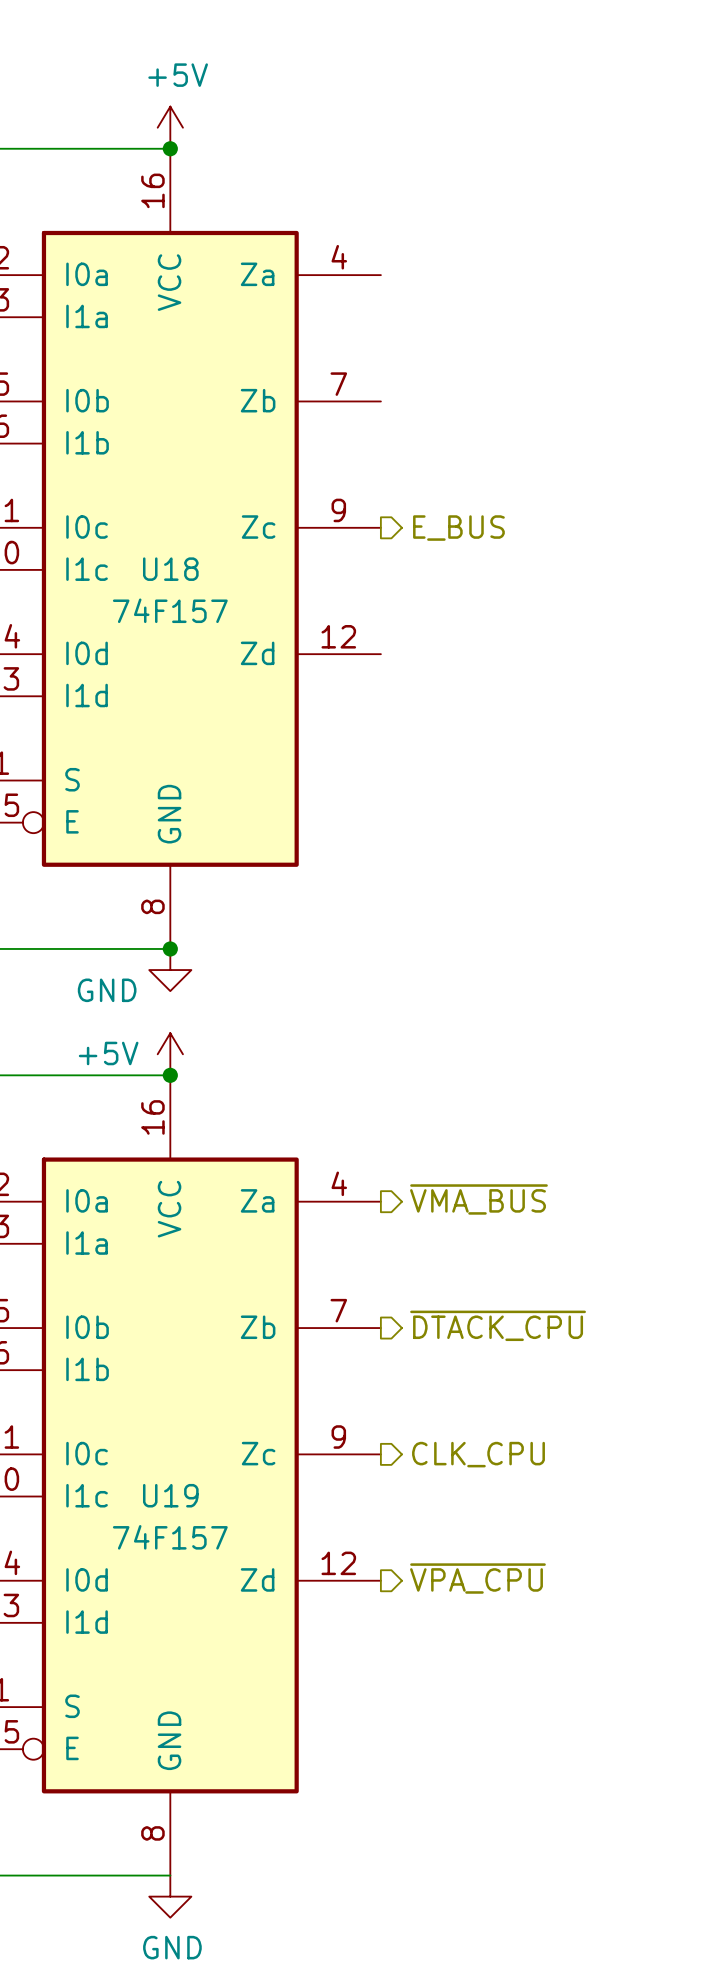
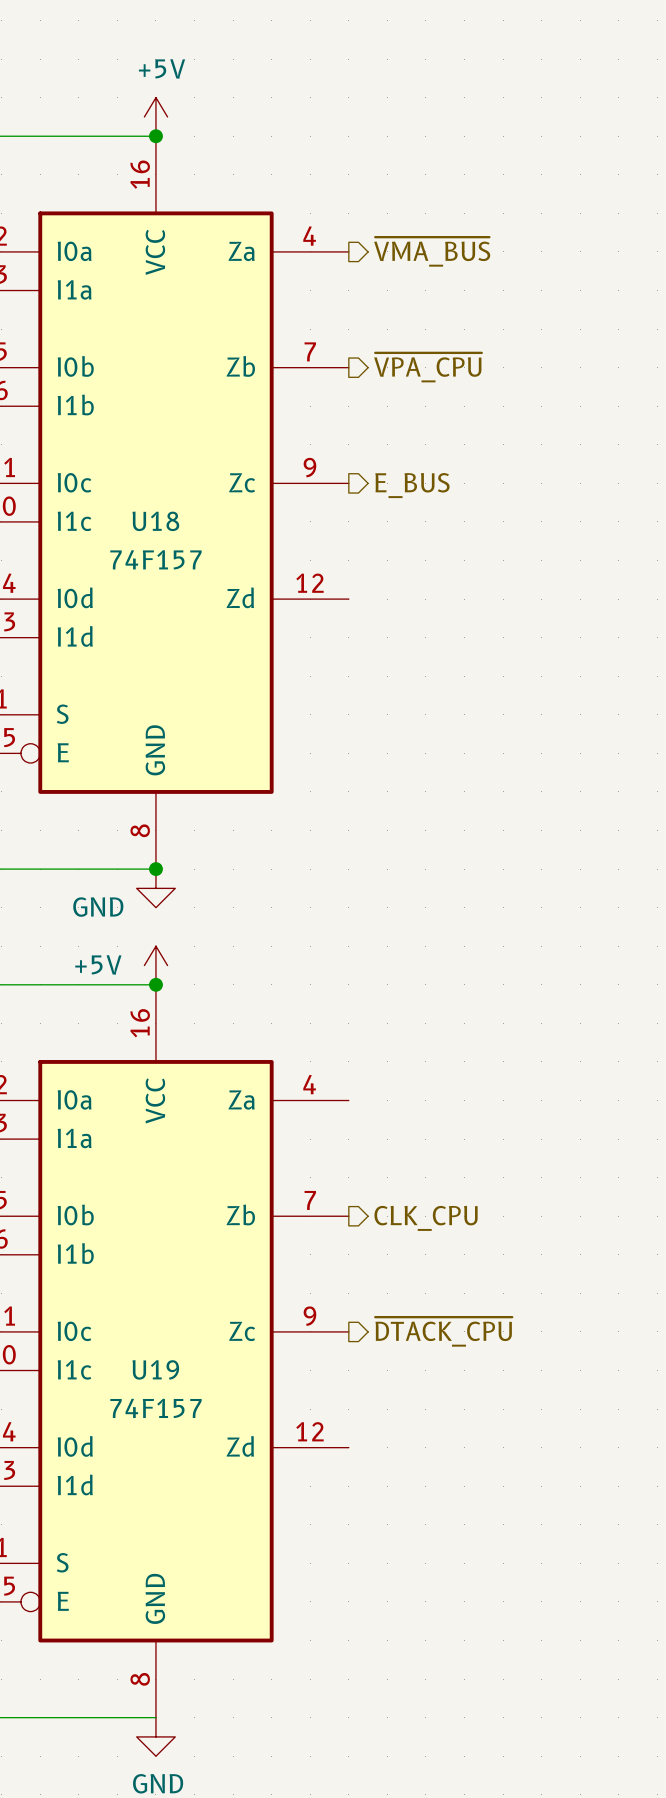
hierarchical label: none -> ~{VMA_BUS} (432, 251)
hierarchical label: none -> ~{VPA_CPU} (427, 367)
hierarchical label: ~{VMA_BUS} (478, 1199) -> none
hierarchical label: ~{DTACK_CPU} (498, 1325) -> CLK_CPU (426, 1218)
hierarchical label: CLK_CPU (478, 1454) -> ~{DTACK_CPU} (443, 1331)
hierarchical label: ~{VPA_CPU} (477, 1578) -> none

